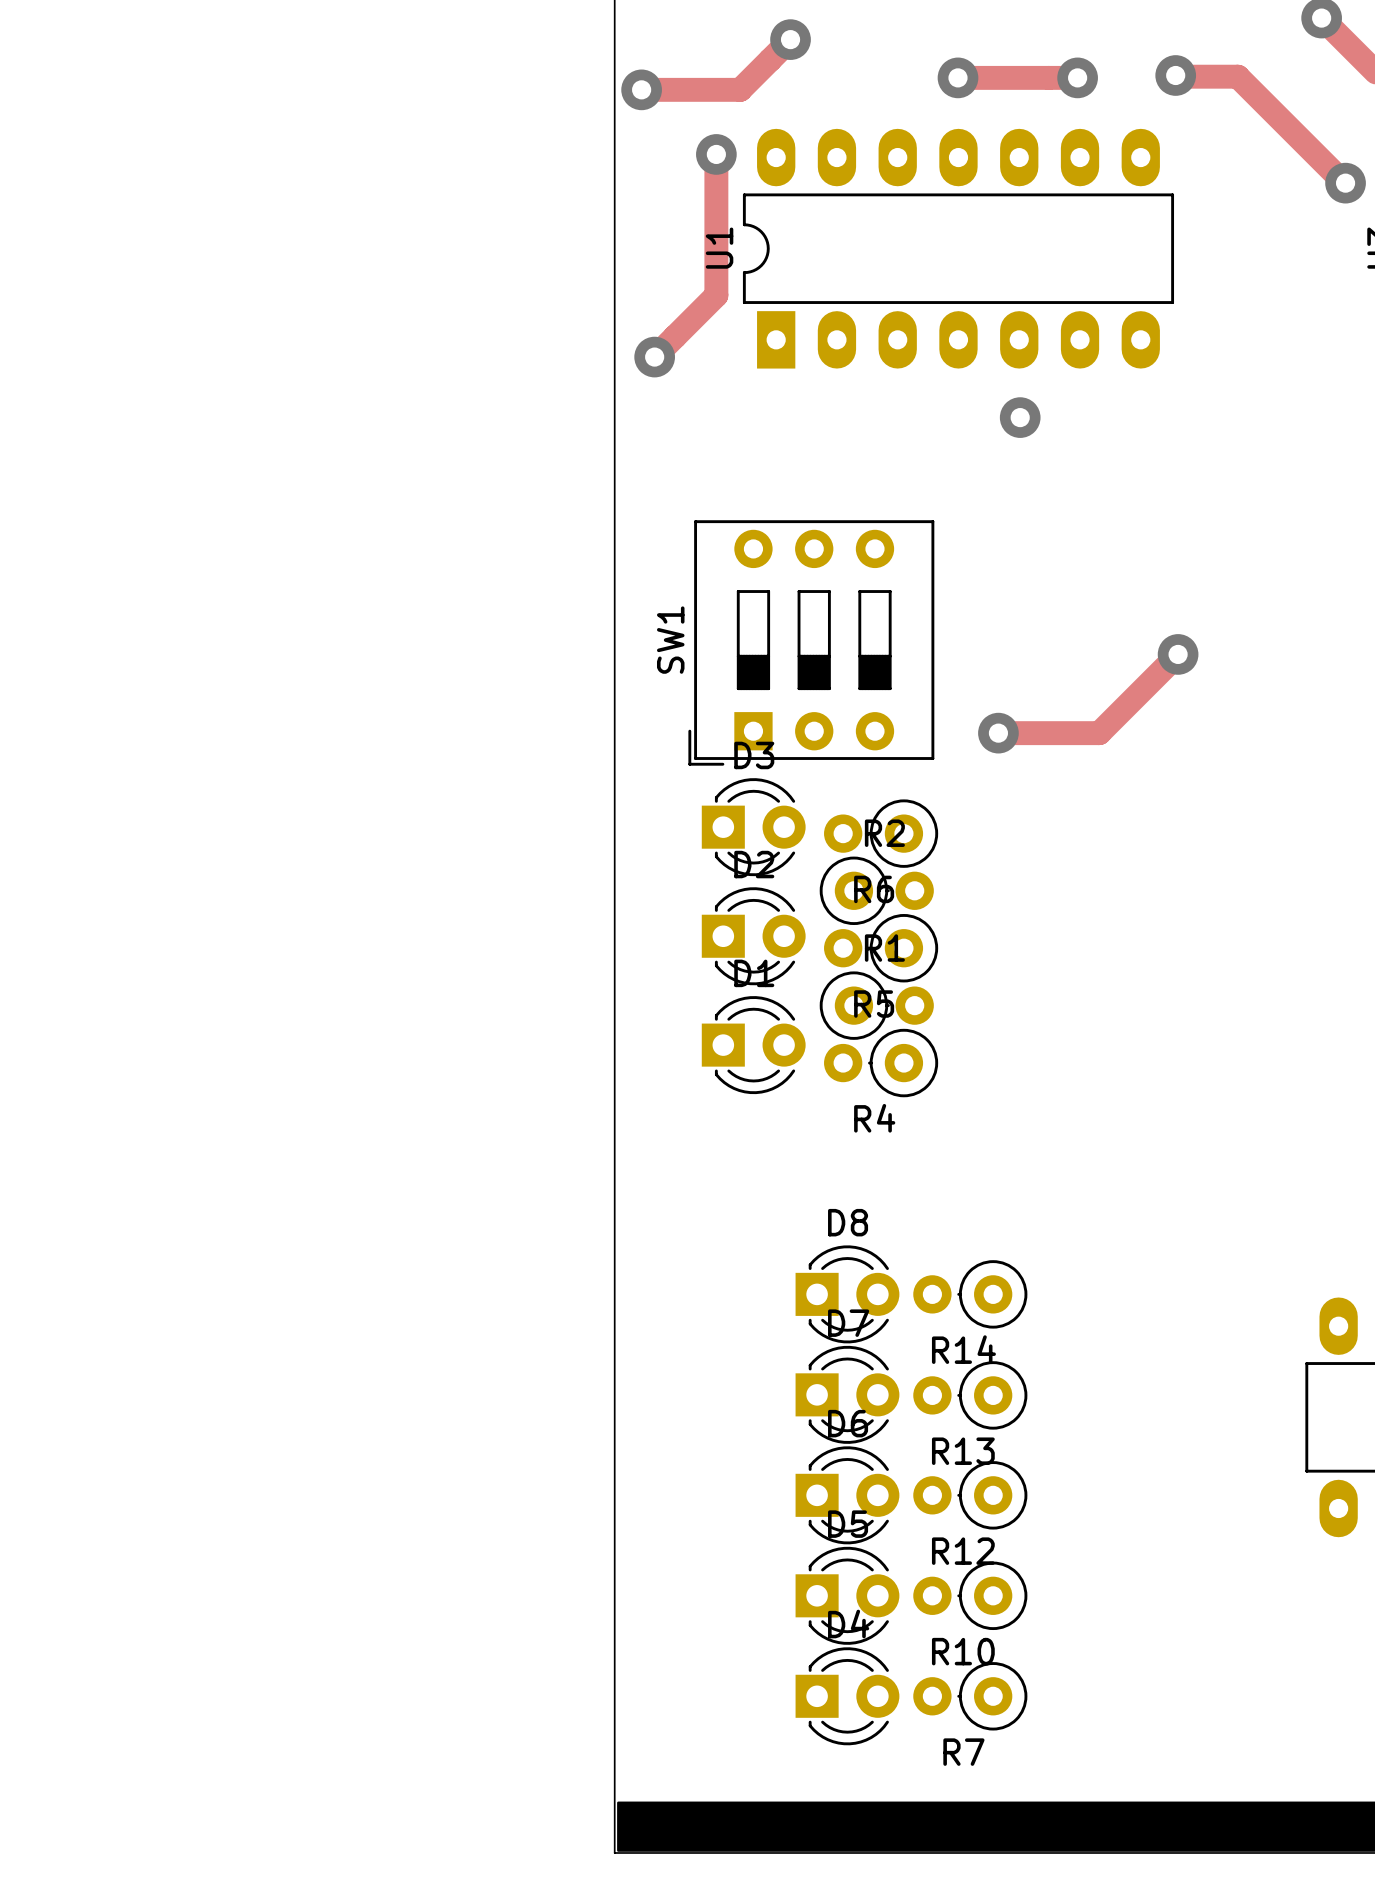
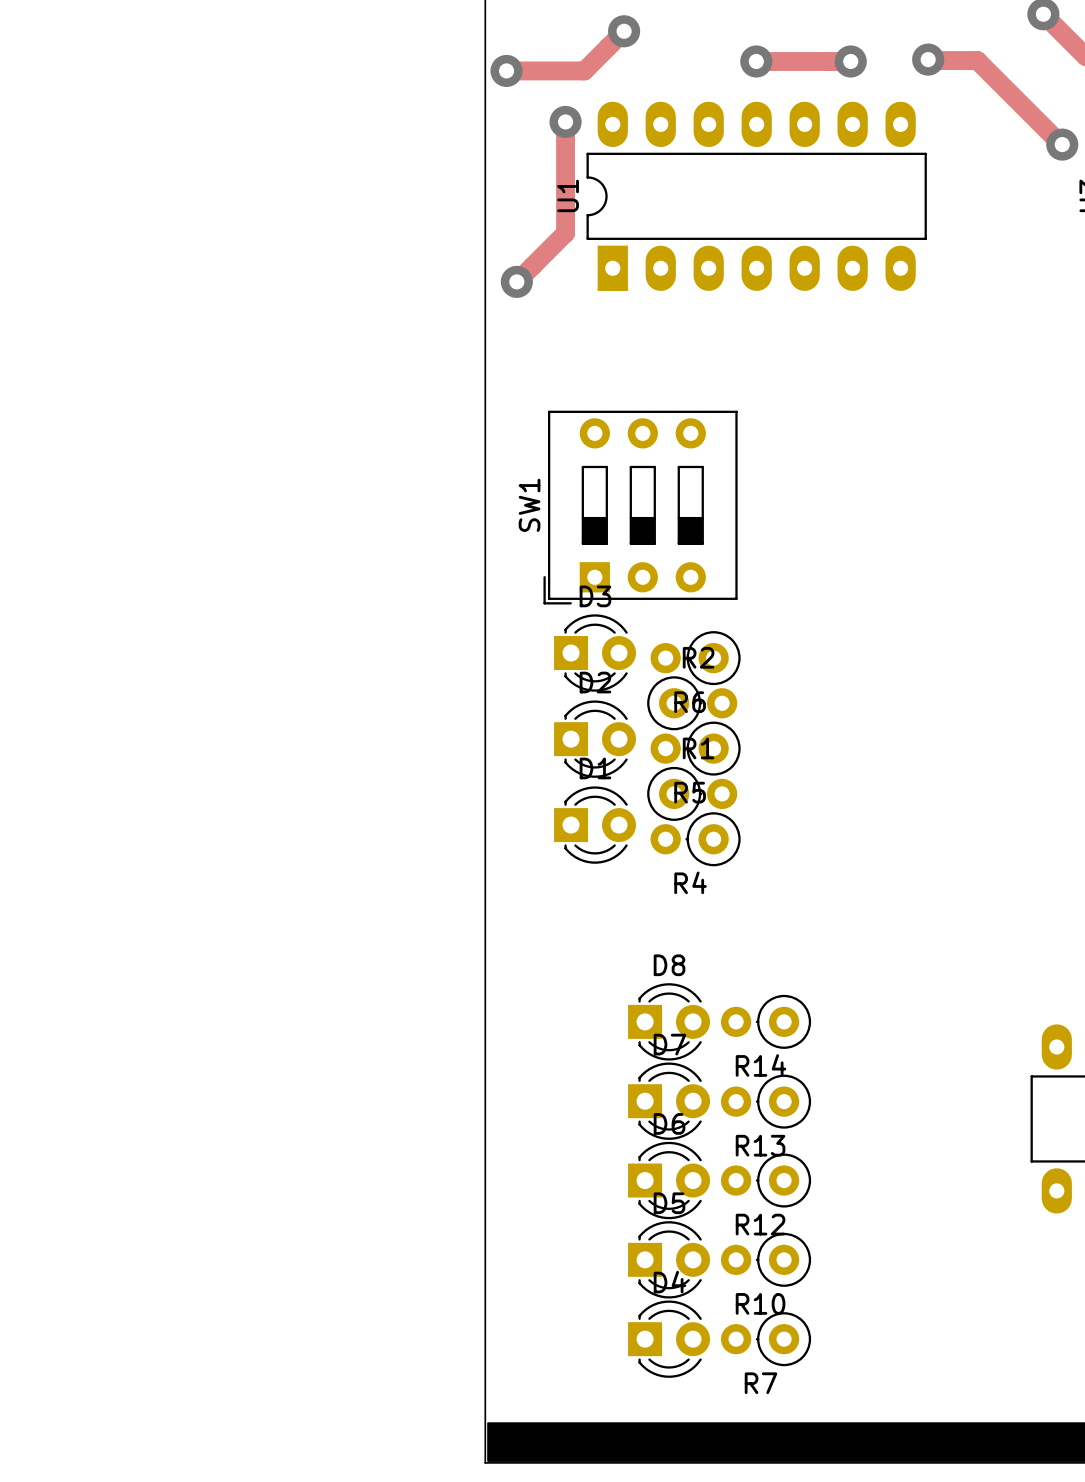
via: (1020, 417) -> none
track: (1178, 654) (1099, 733) (998, 733) -> none
via: (1178, 654) -> none
via: (998, 733) -> none

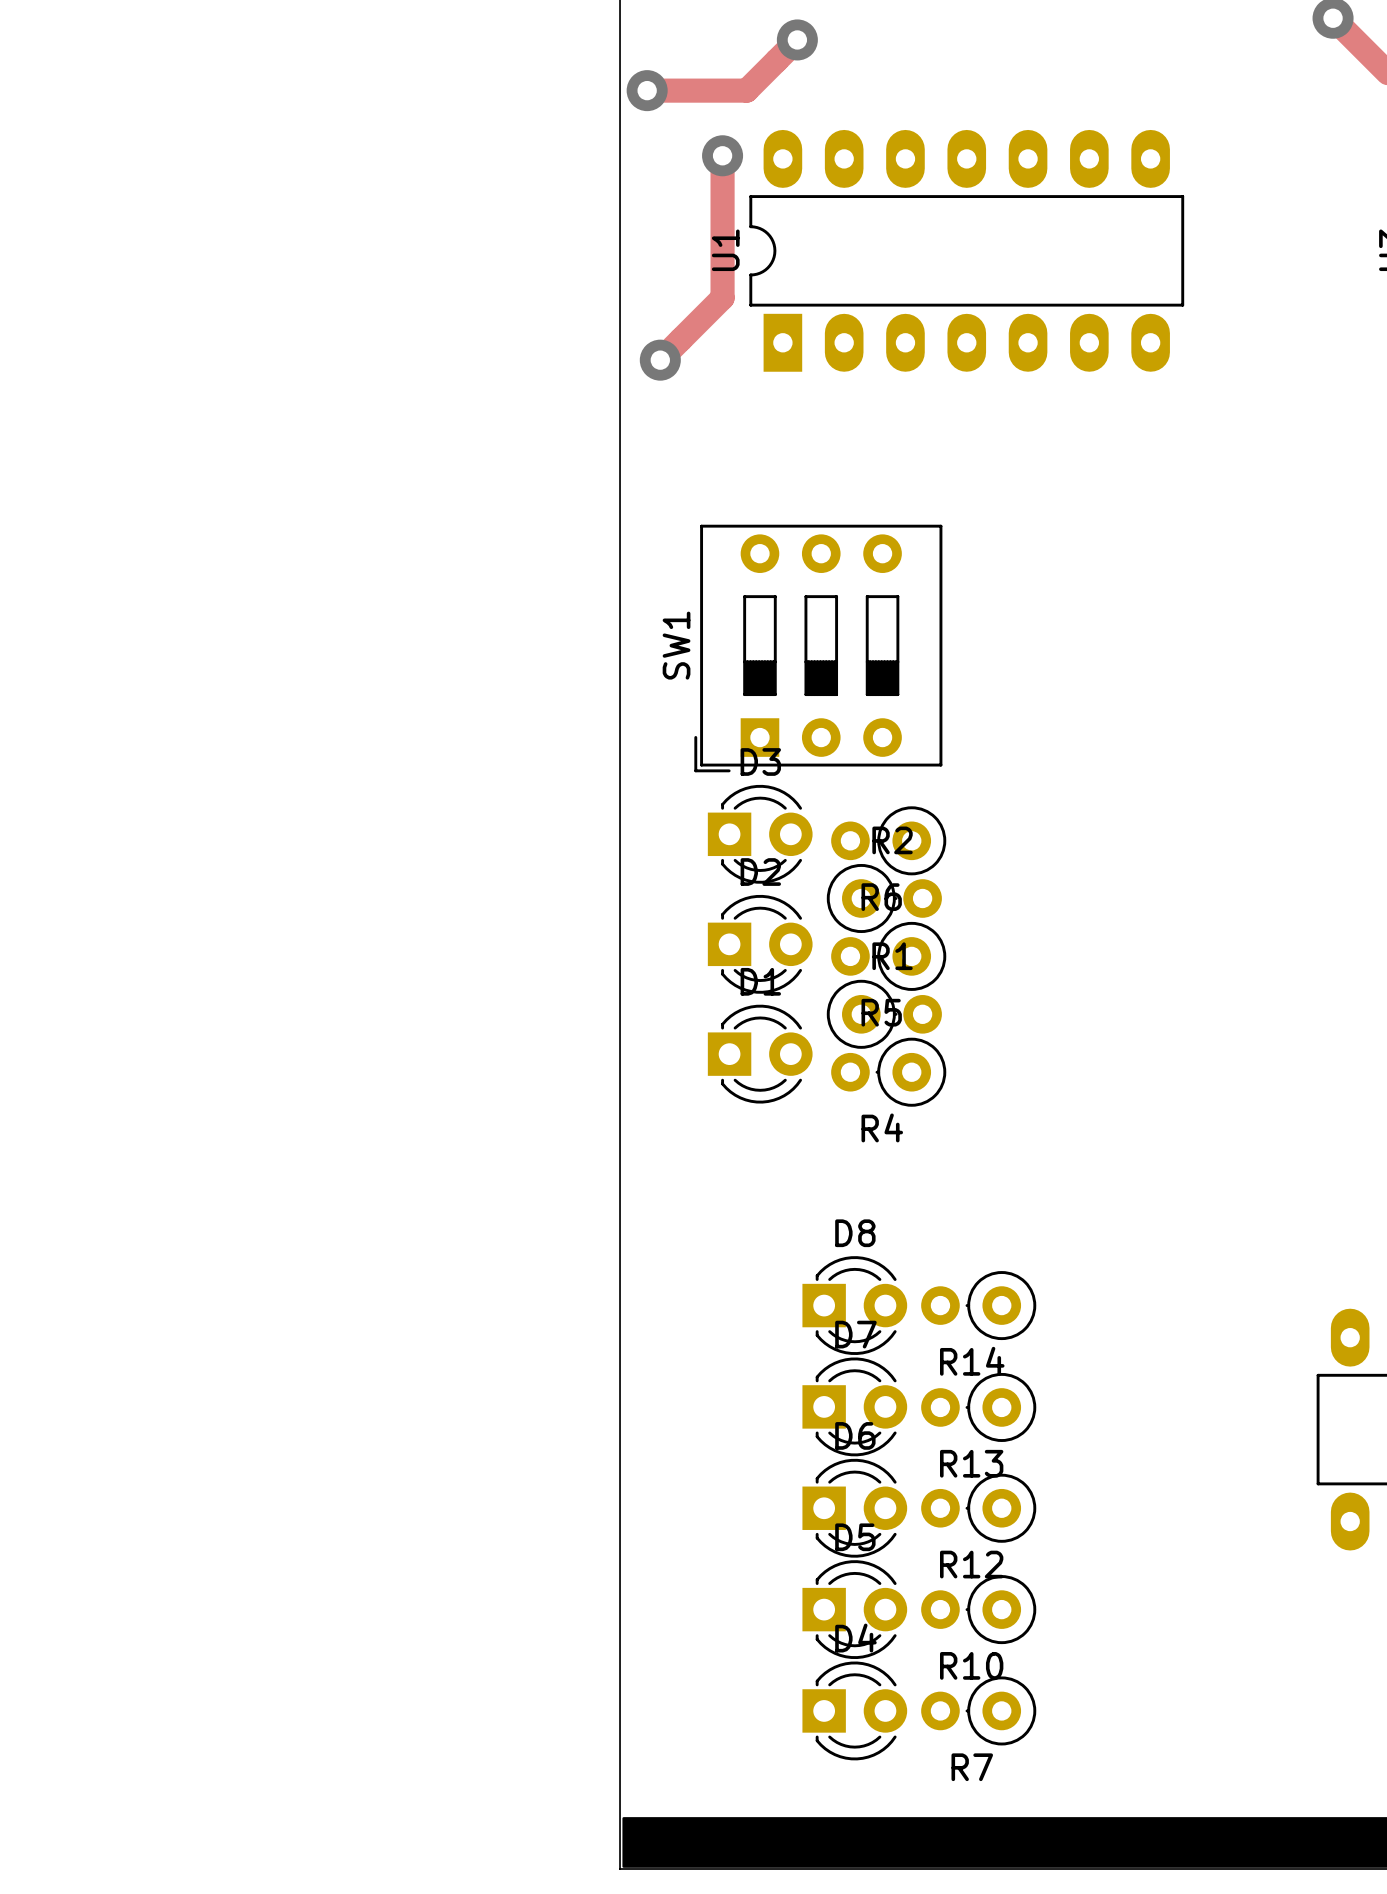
track: (928, 59) (977, 60) (1062, 144) -> none
via: (928, 59) -> none
track: (756, 61) (850, 61) -> none
via: (756, 61) -> none
via: (850, 61) -> none
via: (1062, 144) -> none

